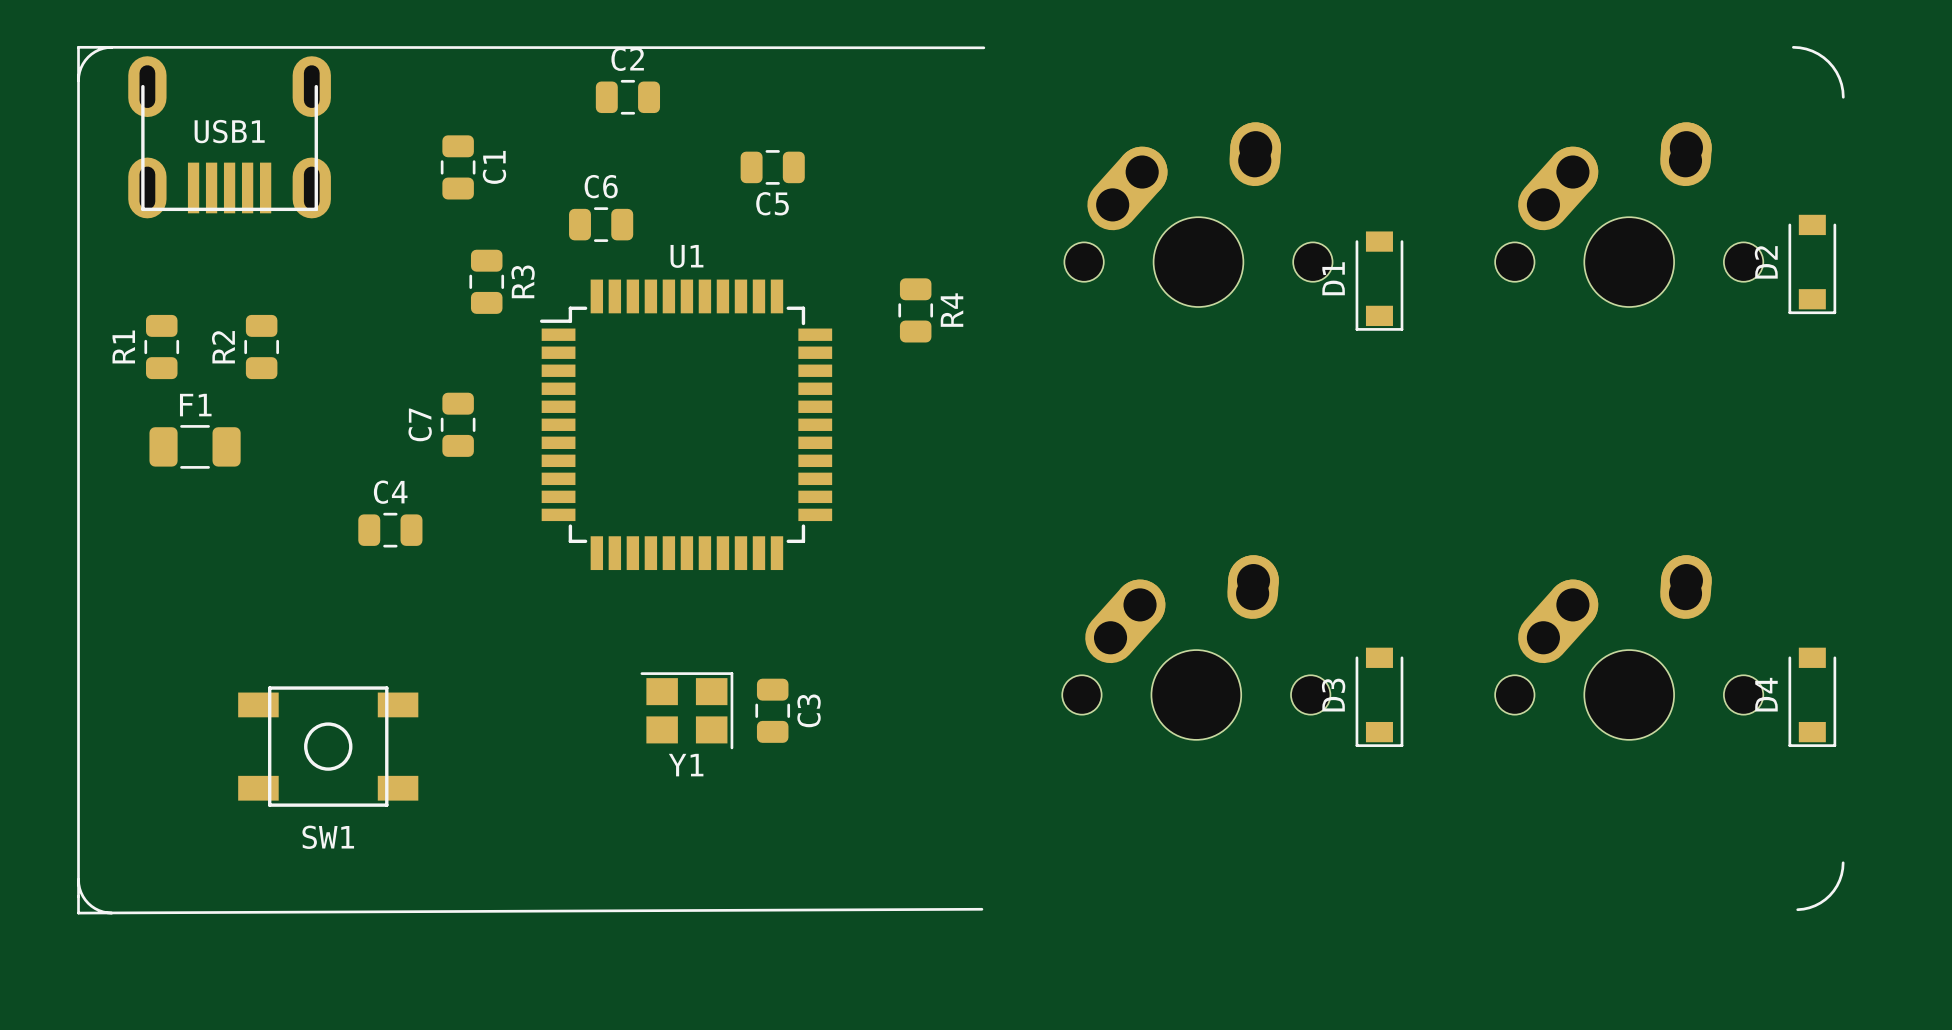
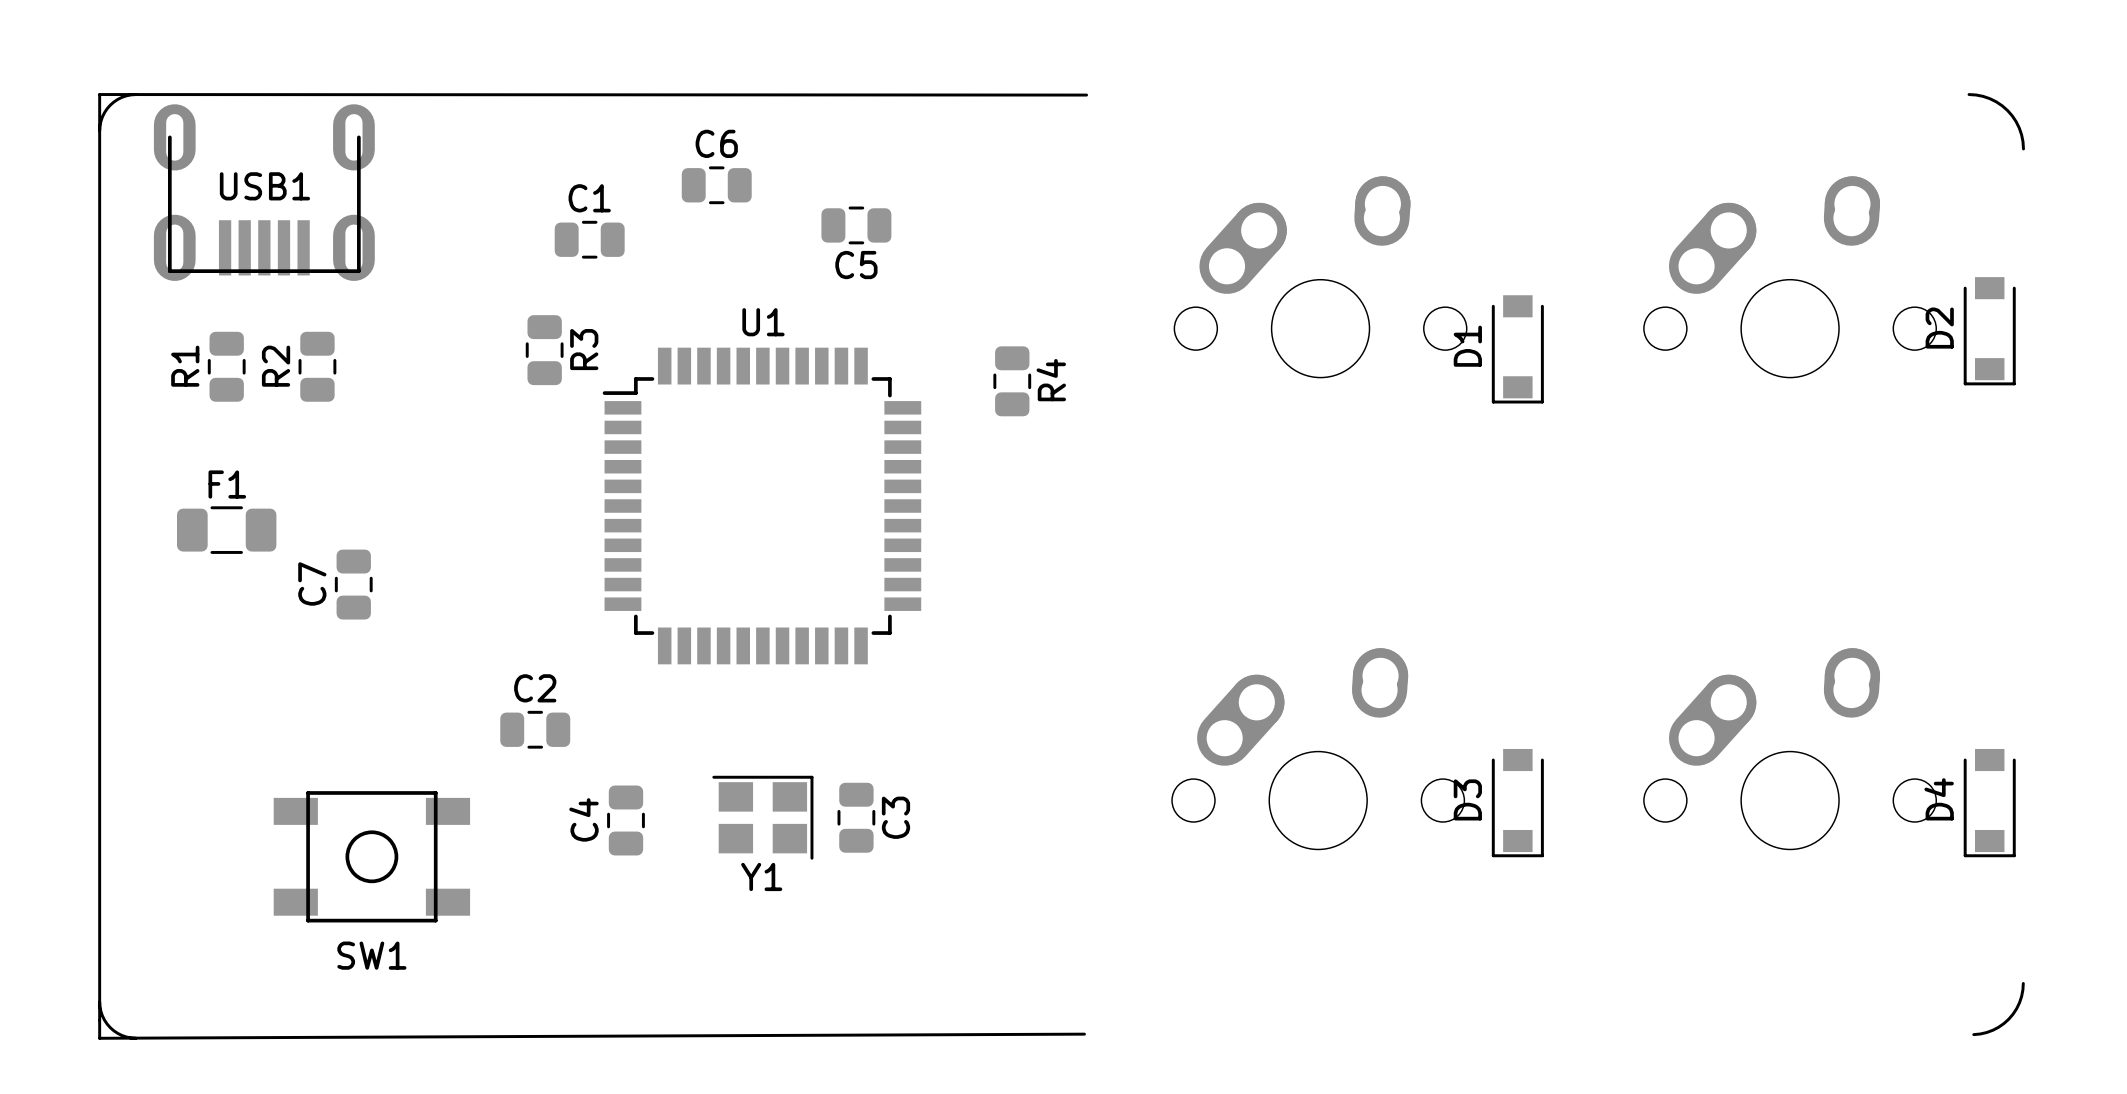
C2 position: (627, 97) -> (535, 729)
C1 rotation: 0° (458, 167) -> 90° clockwise (589, 239)
C1 position: (458, 167) -> (589, 239)
C1 name position: C1 (494, 167) -> C1 (589, 198)
C6 position: (601, 224) -> (716, 185)
R1 position: (161, 347) -> (226, 366)
R2 position: (261, 347) -> (317, 366)
C7 position: (458, 424) -> (353, 584)
C4 name position: C4 (390, 492) -> C4 (583, 819)
C4 rotation: 0° (390, 530) -> 90° clockwise (625, 820)
C4 position: (390, 530) -> (625, 820)

